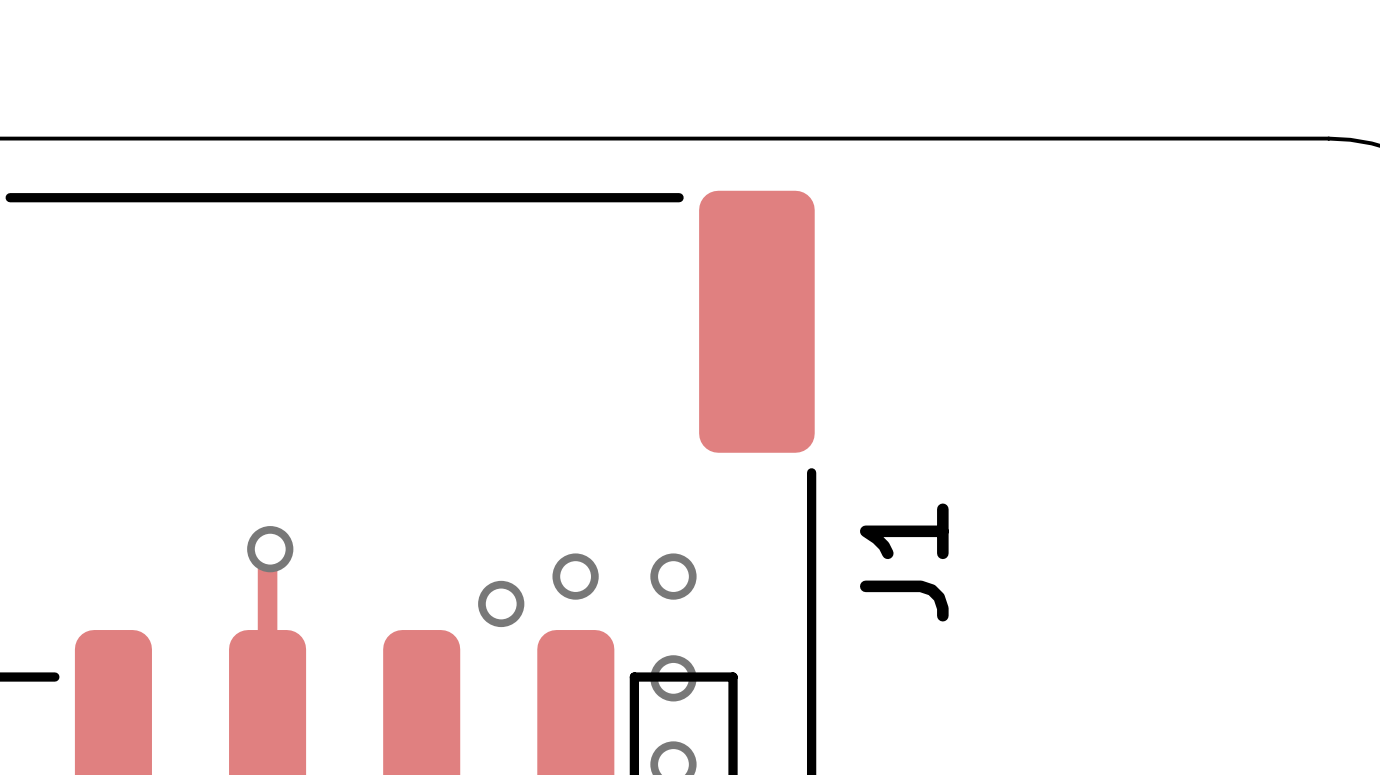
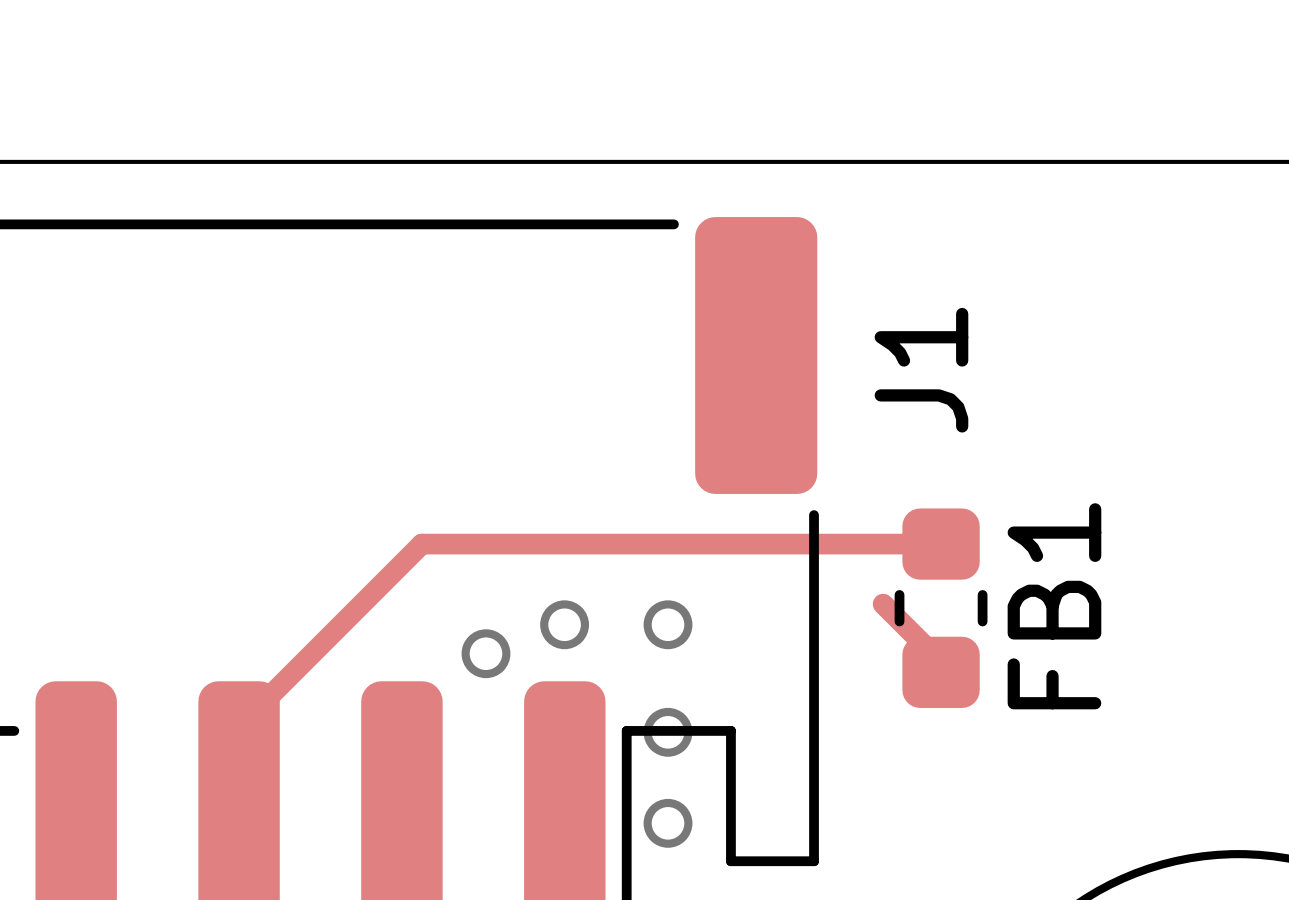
track: (270, 549) (267, 551) (267, 673) -> (941, 544) (421, 544) (239, 726)
via: (270, 549) -> none
track: none -> (883, 604) (941, 662) (941, 672)
FB1: none -> (941, 608)
J1 name position: J1 (904, 562) -> J1 (921, 370)

